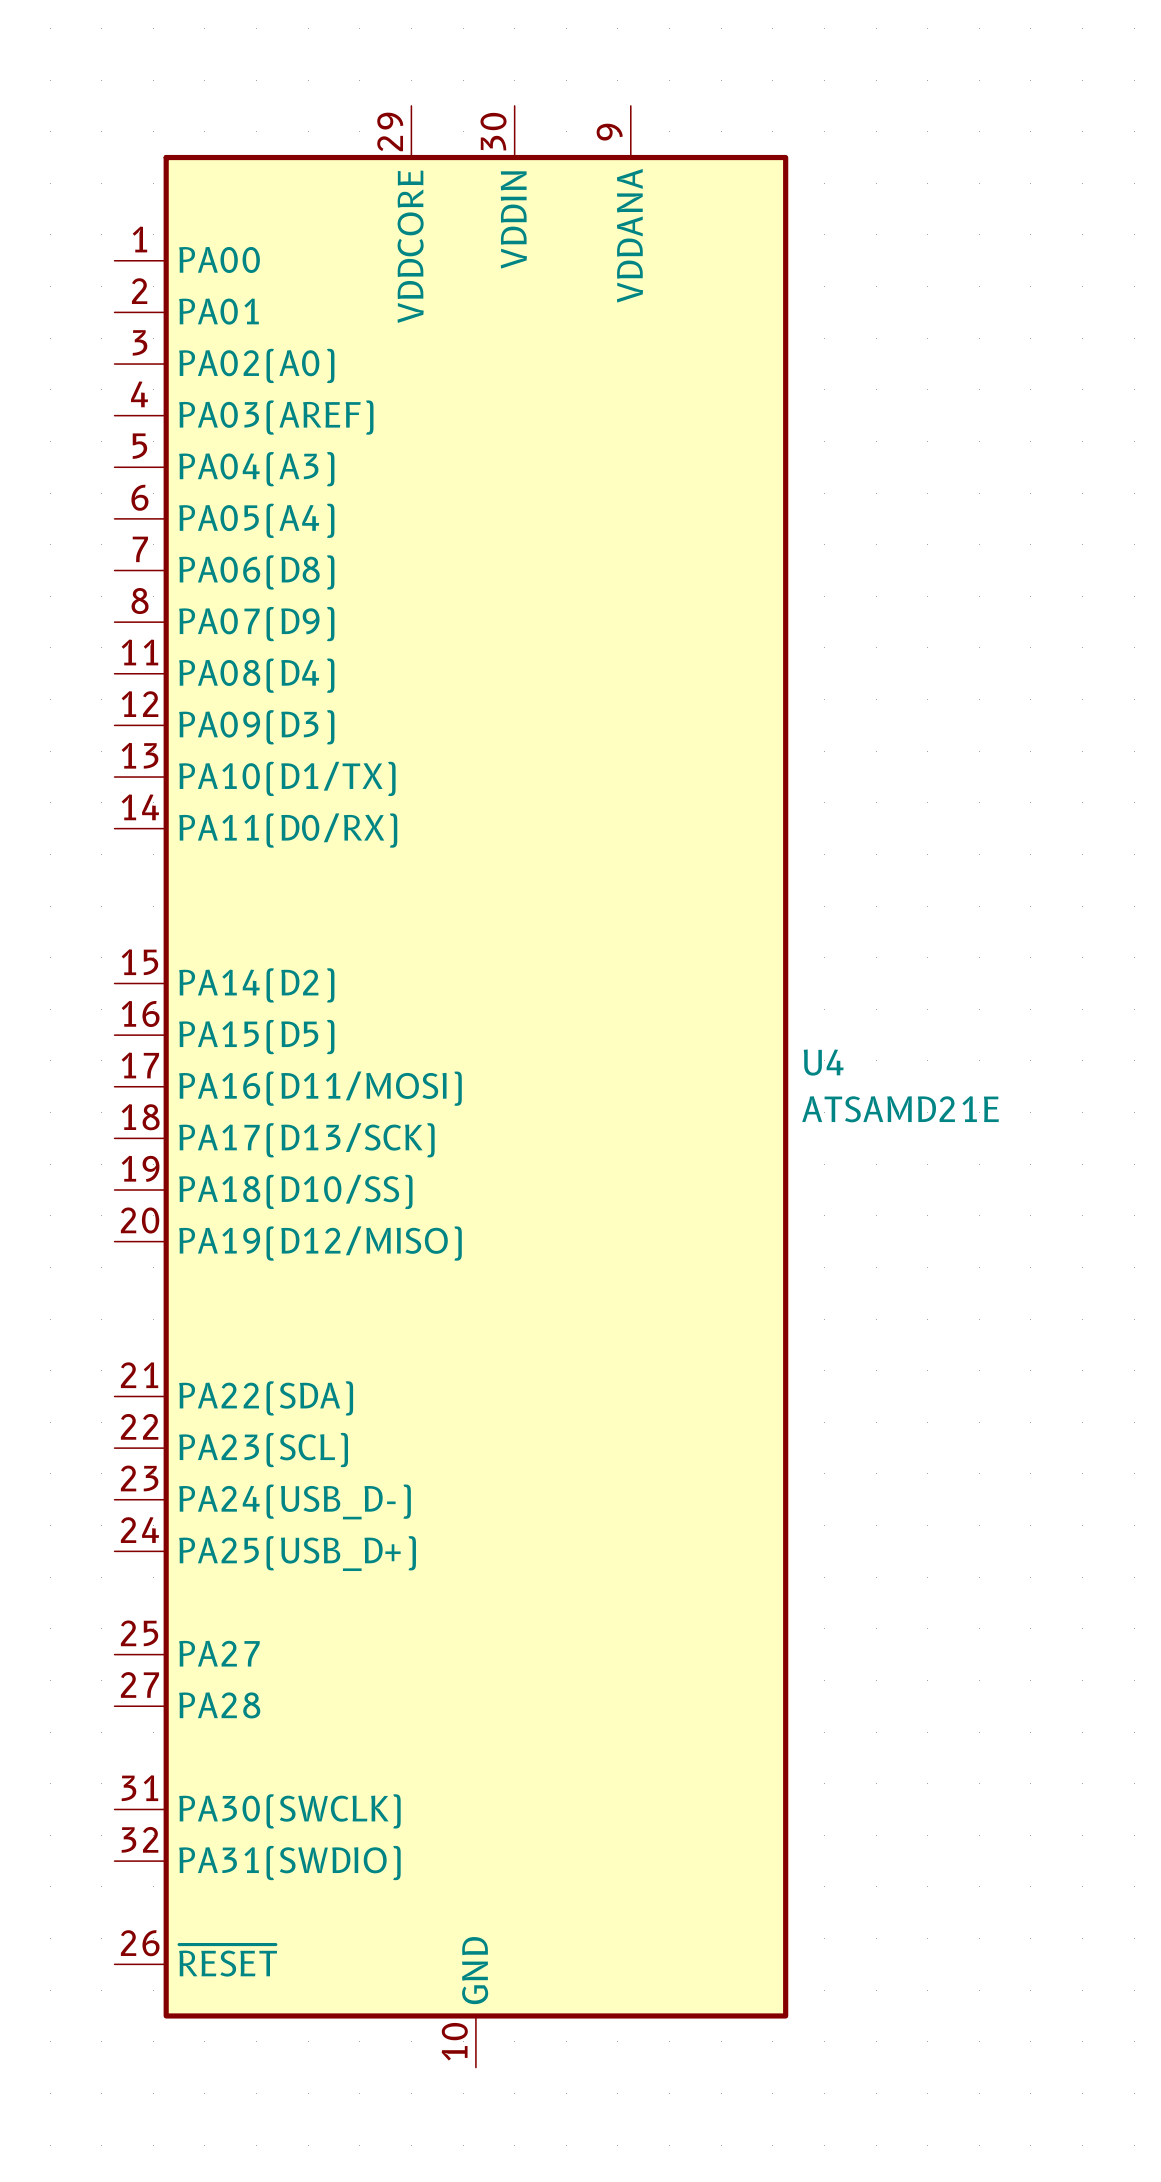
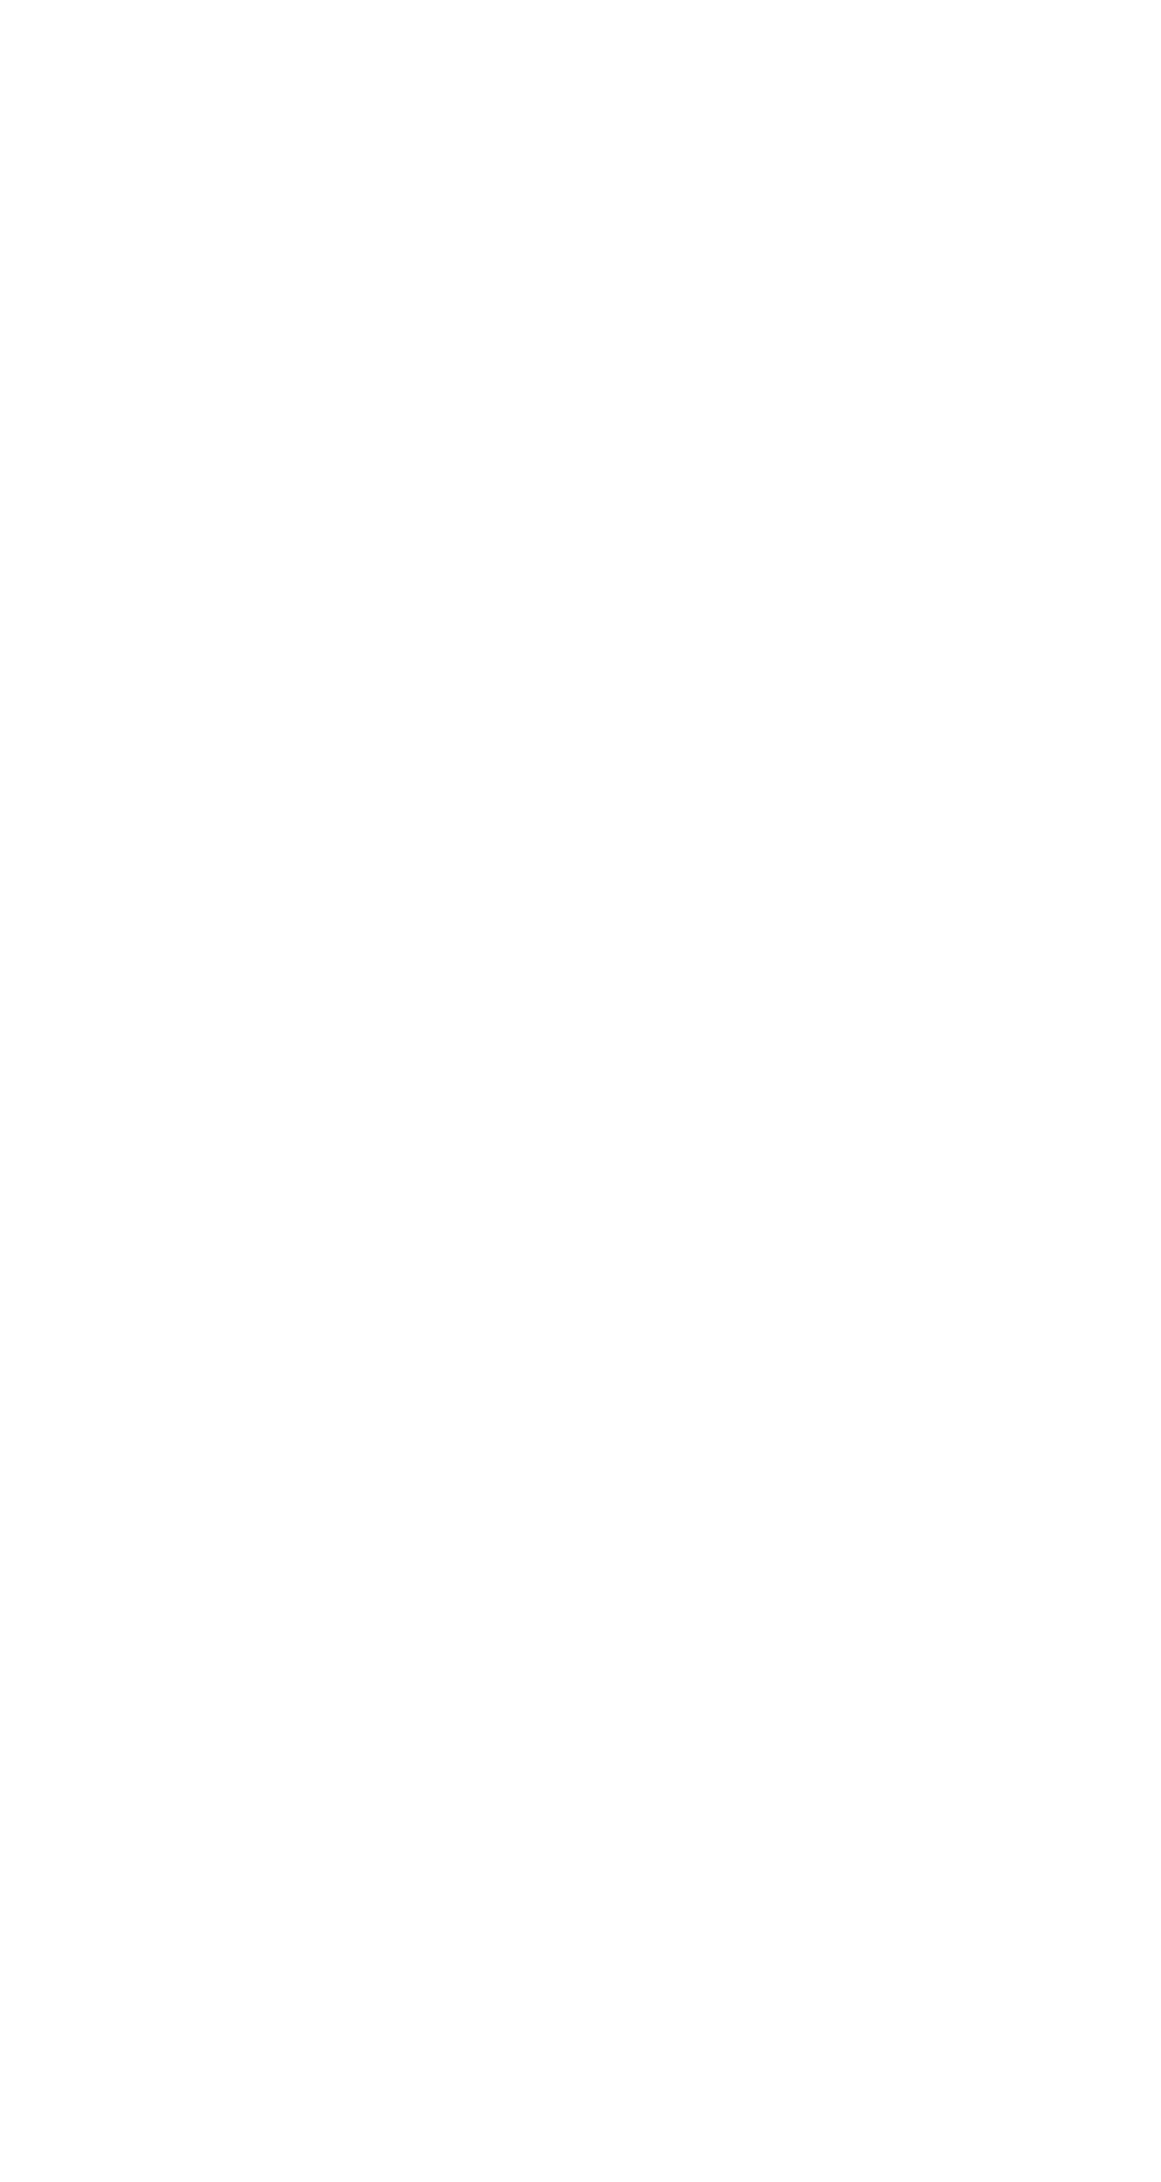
U4: ATSAMD21E (451, 1086) -> none

